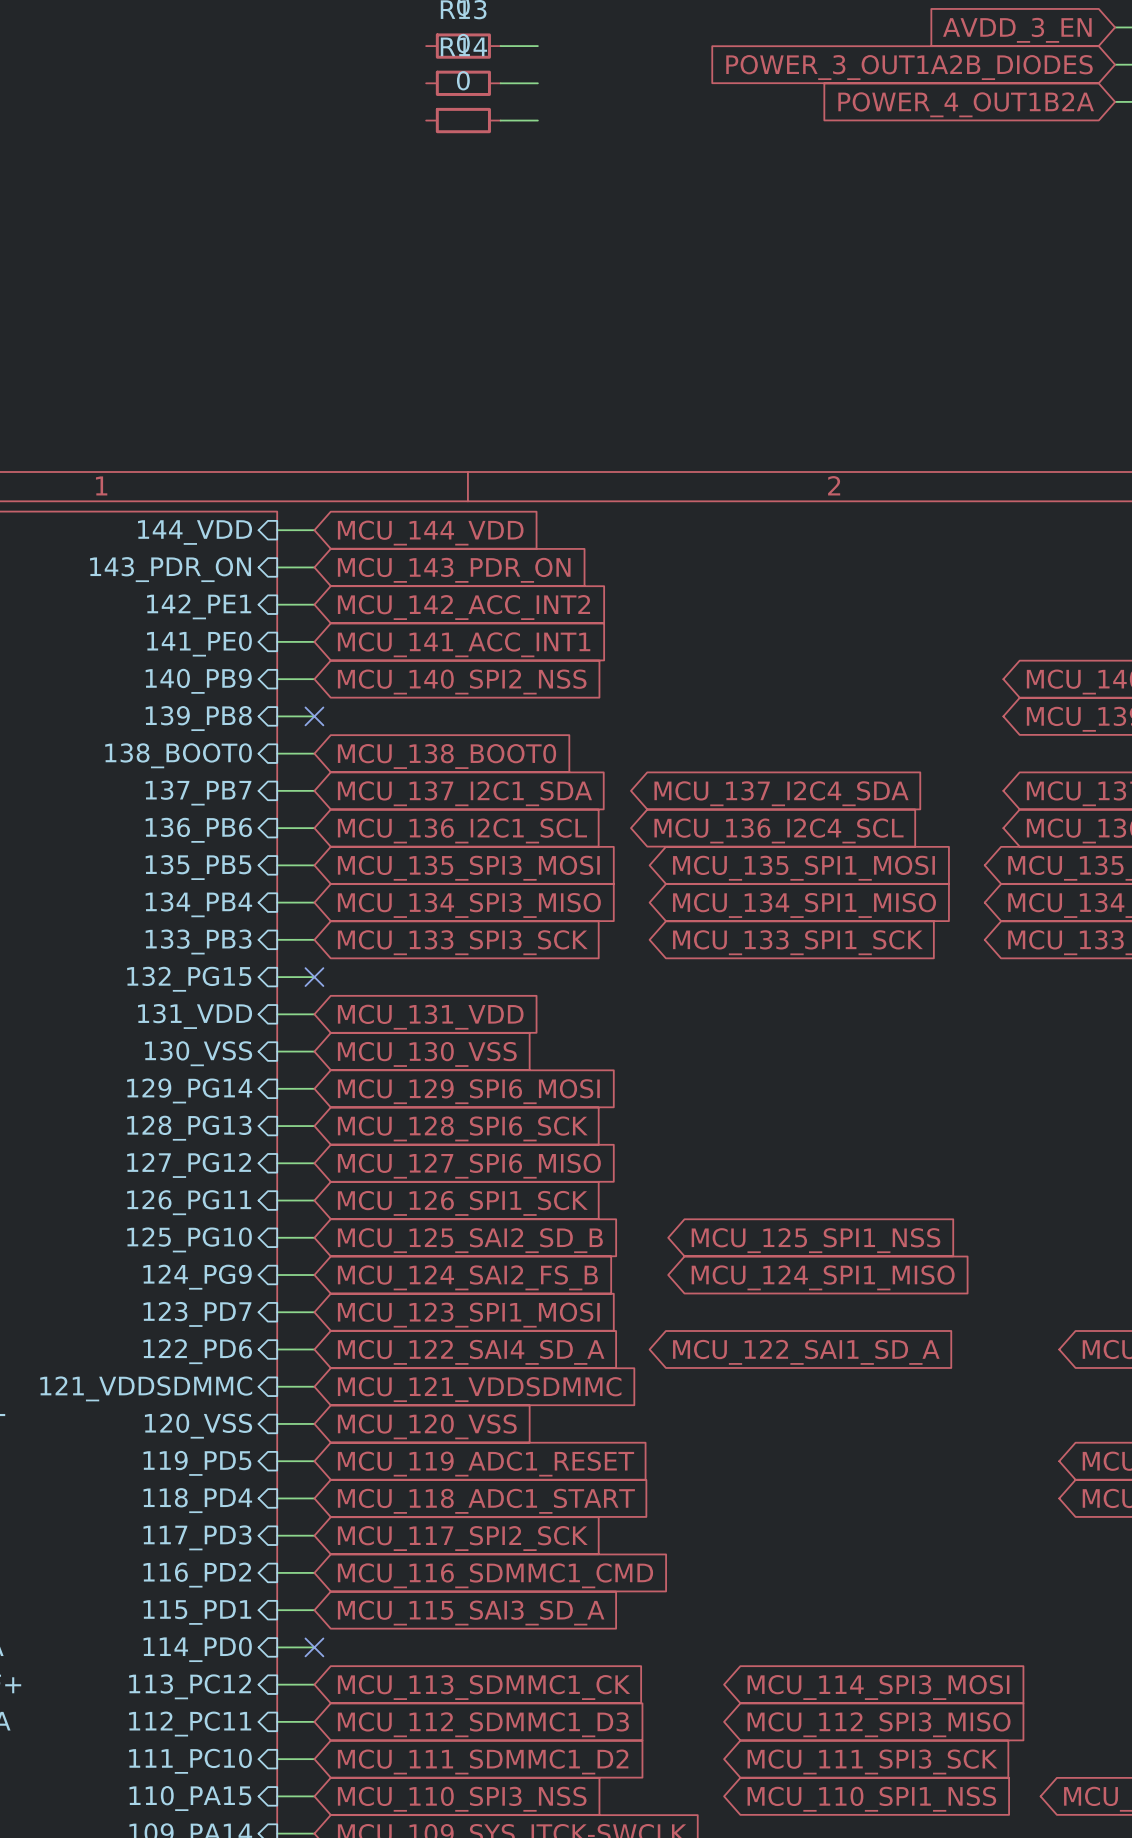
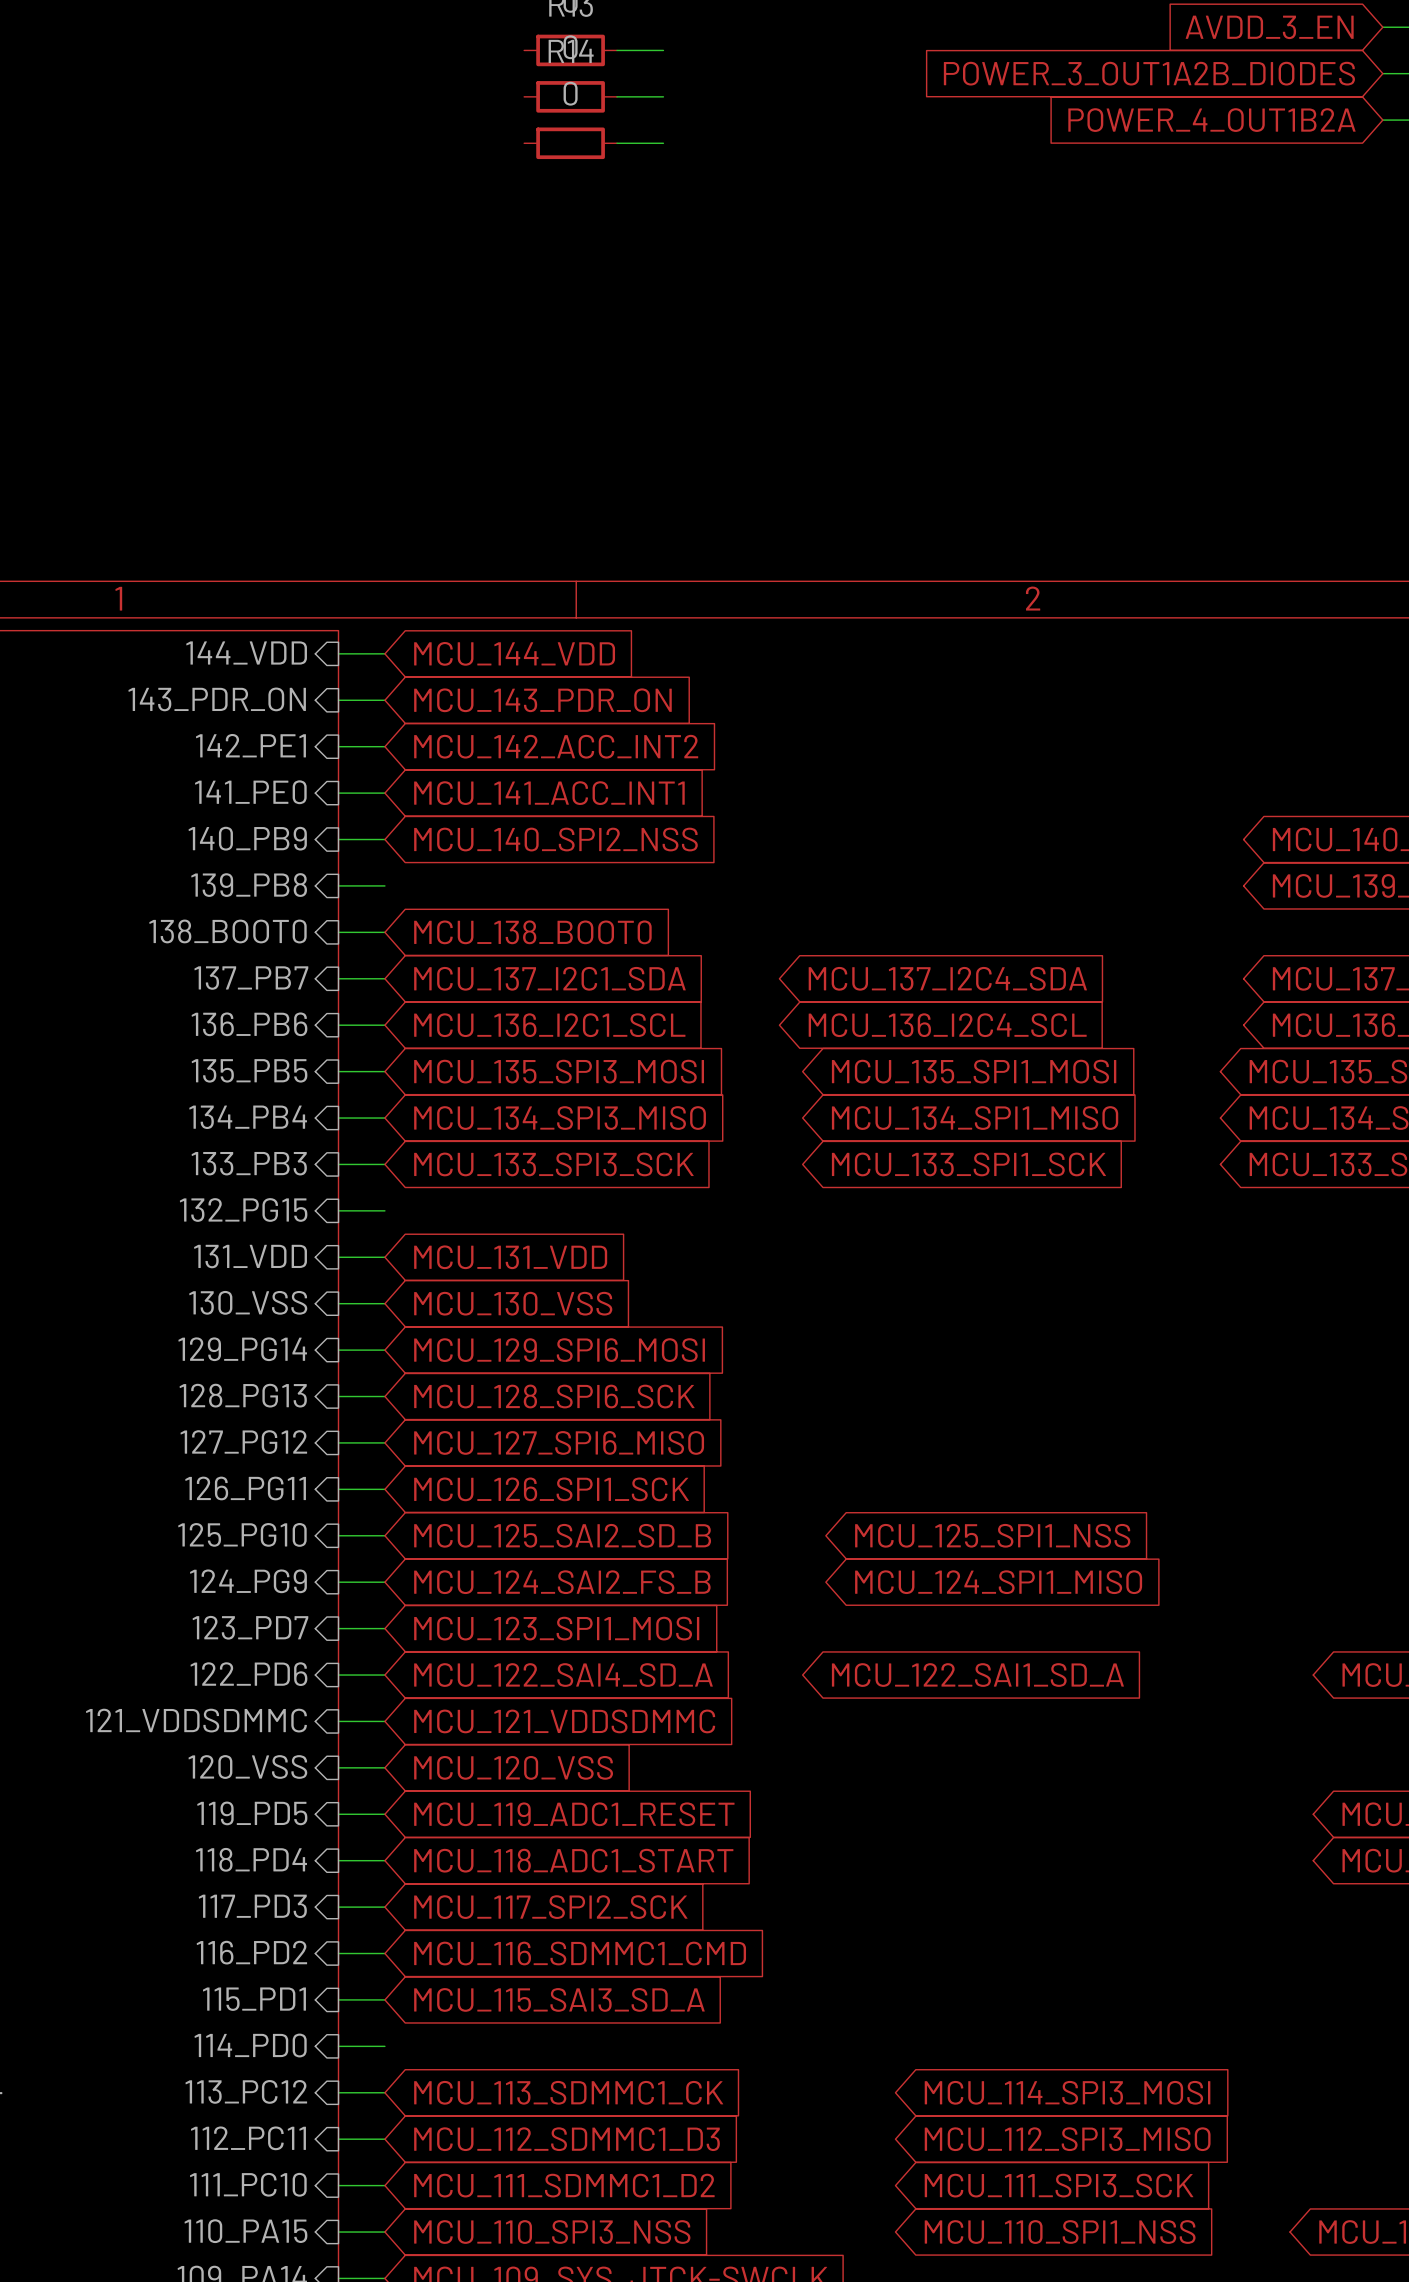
no-connect mark: (314, 716) -> none
no-connect mark: (314, 977) -> none
no-connect mark: (314, 1647) -> none

